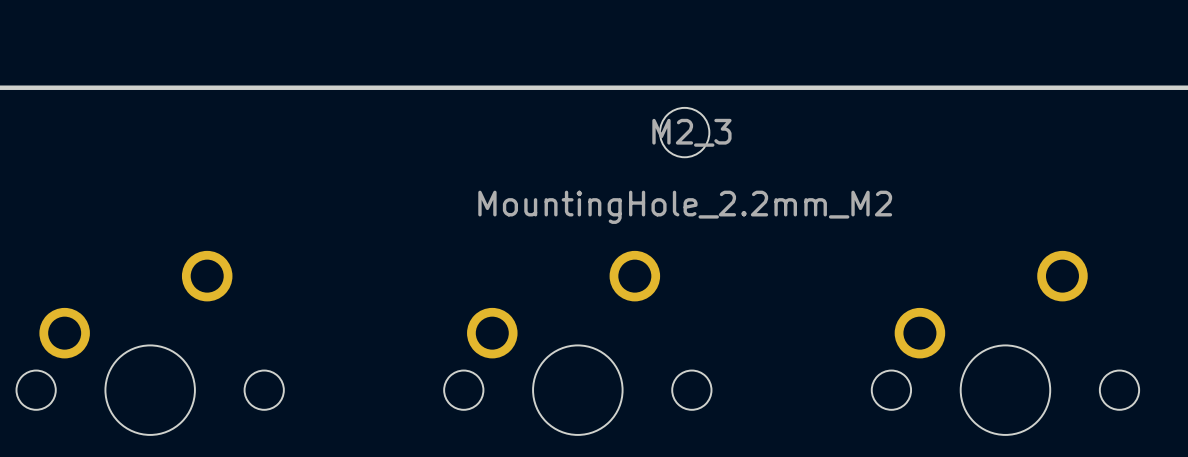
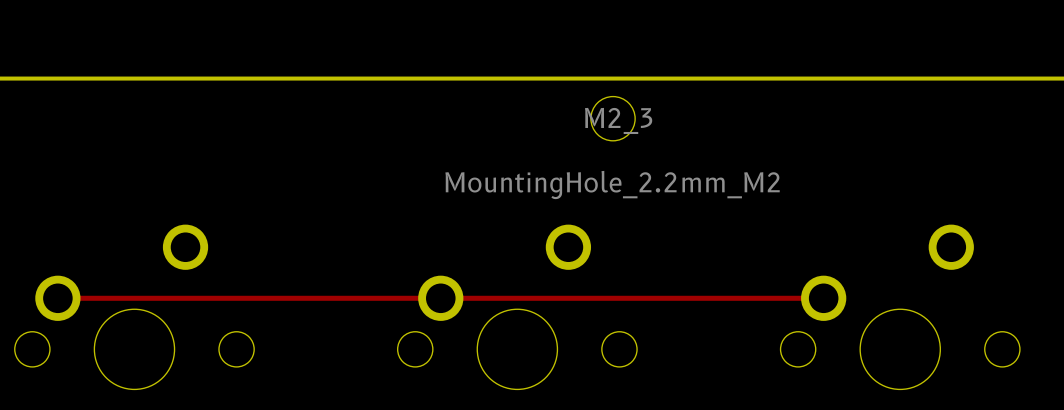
track: none -> (57, 298) (823, 298)

